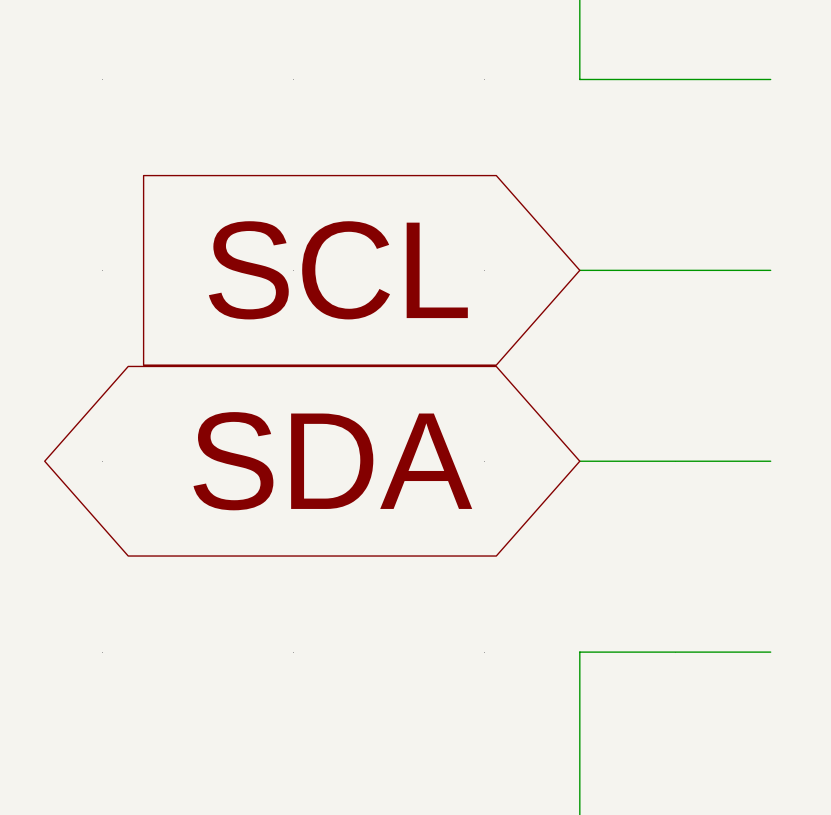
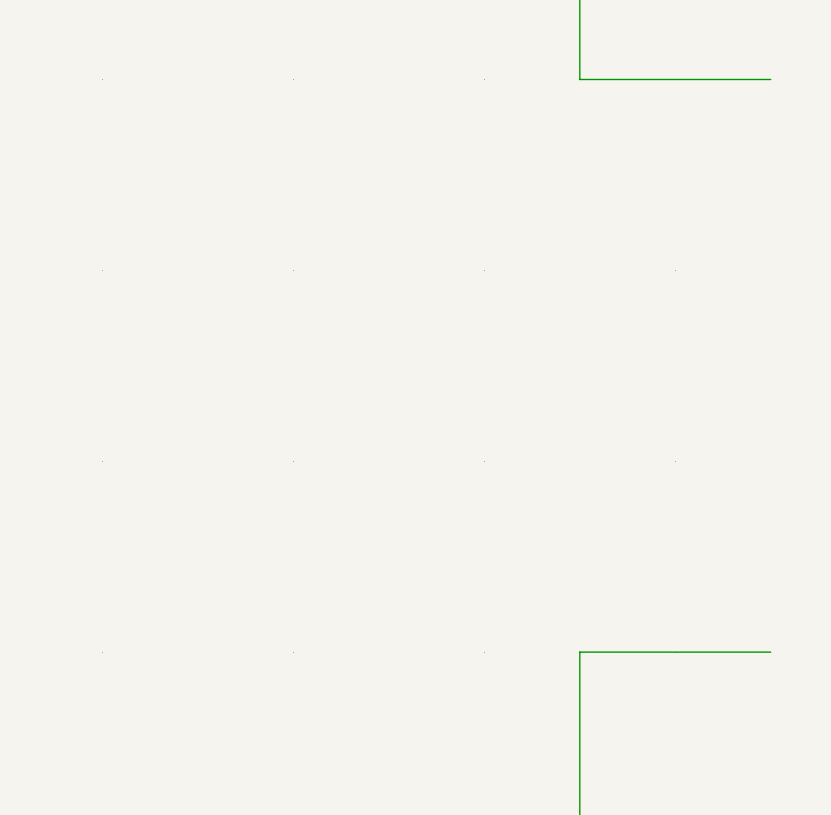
global label: SCL (338, 270) -> none
wire: (579, 270) (770, 270) -> none
global label: SDA (332, 461) -> none
wire: (579, 461) (770, 461) -> none

